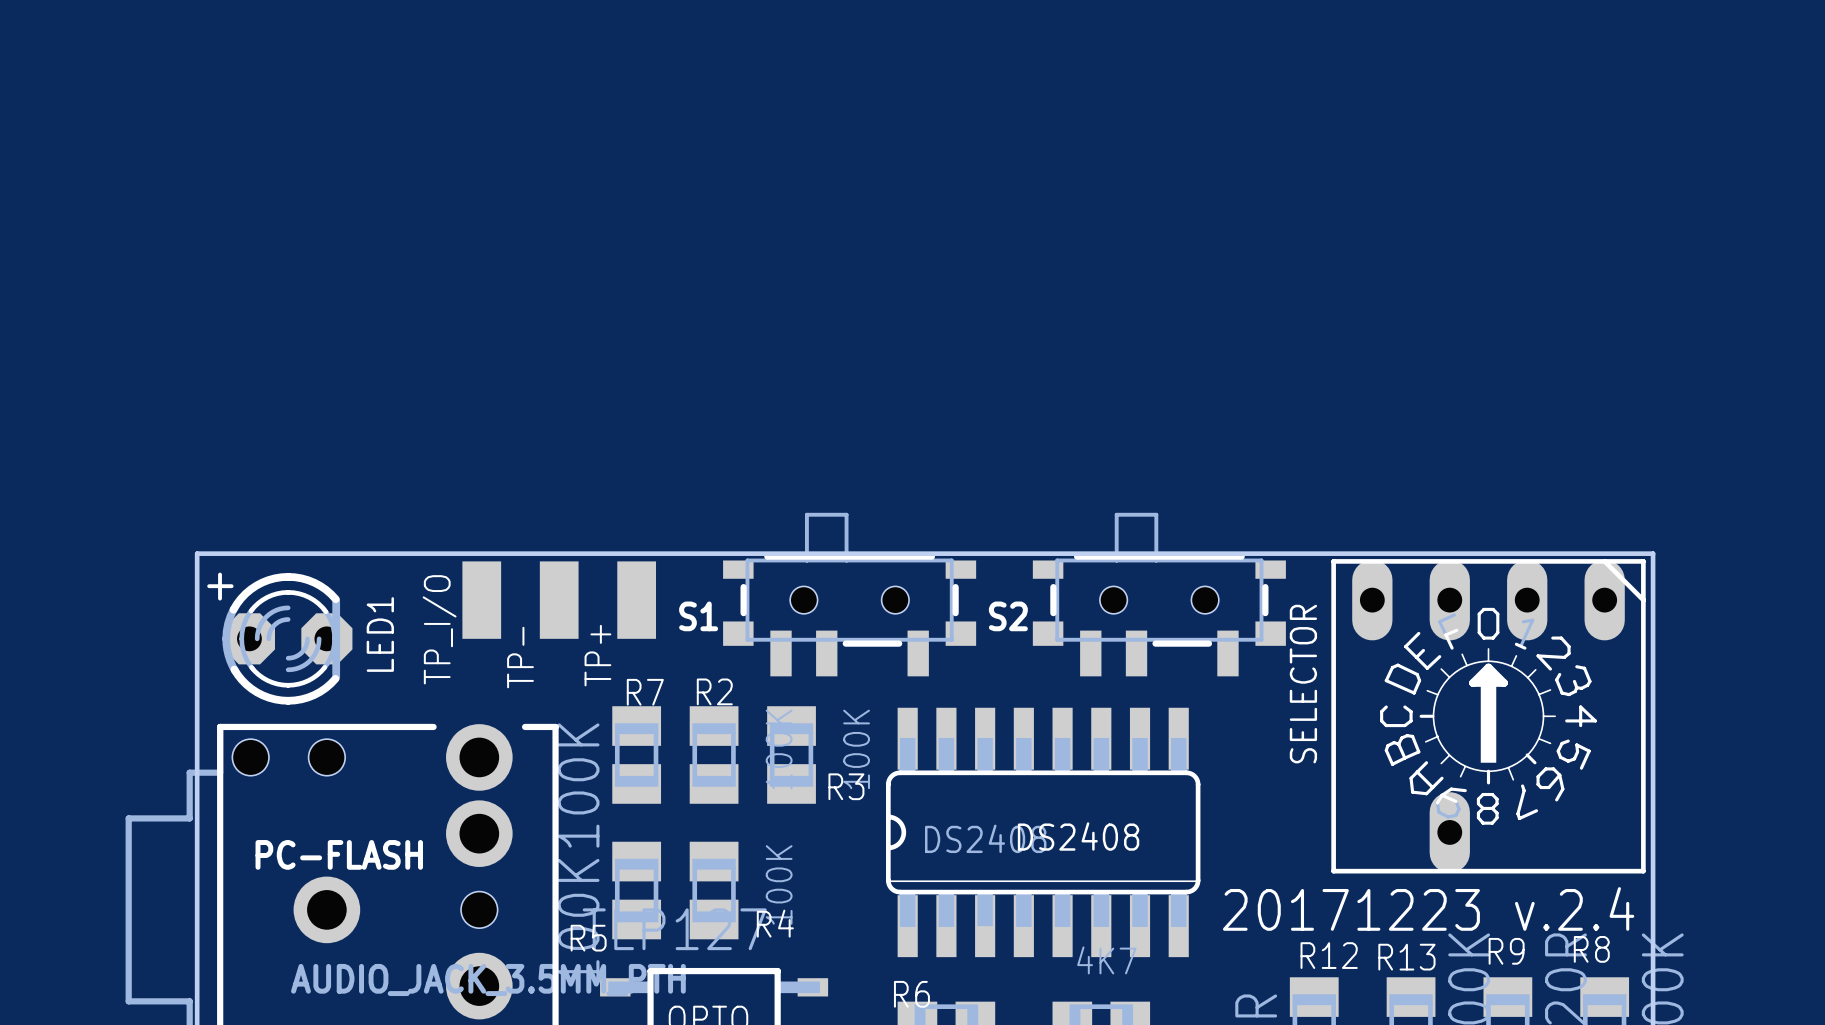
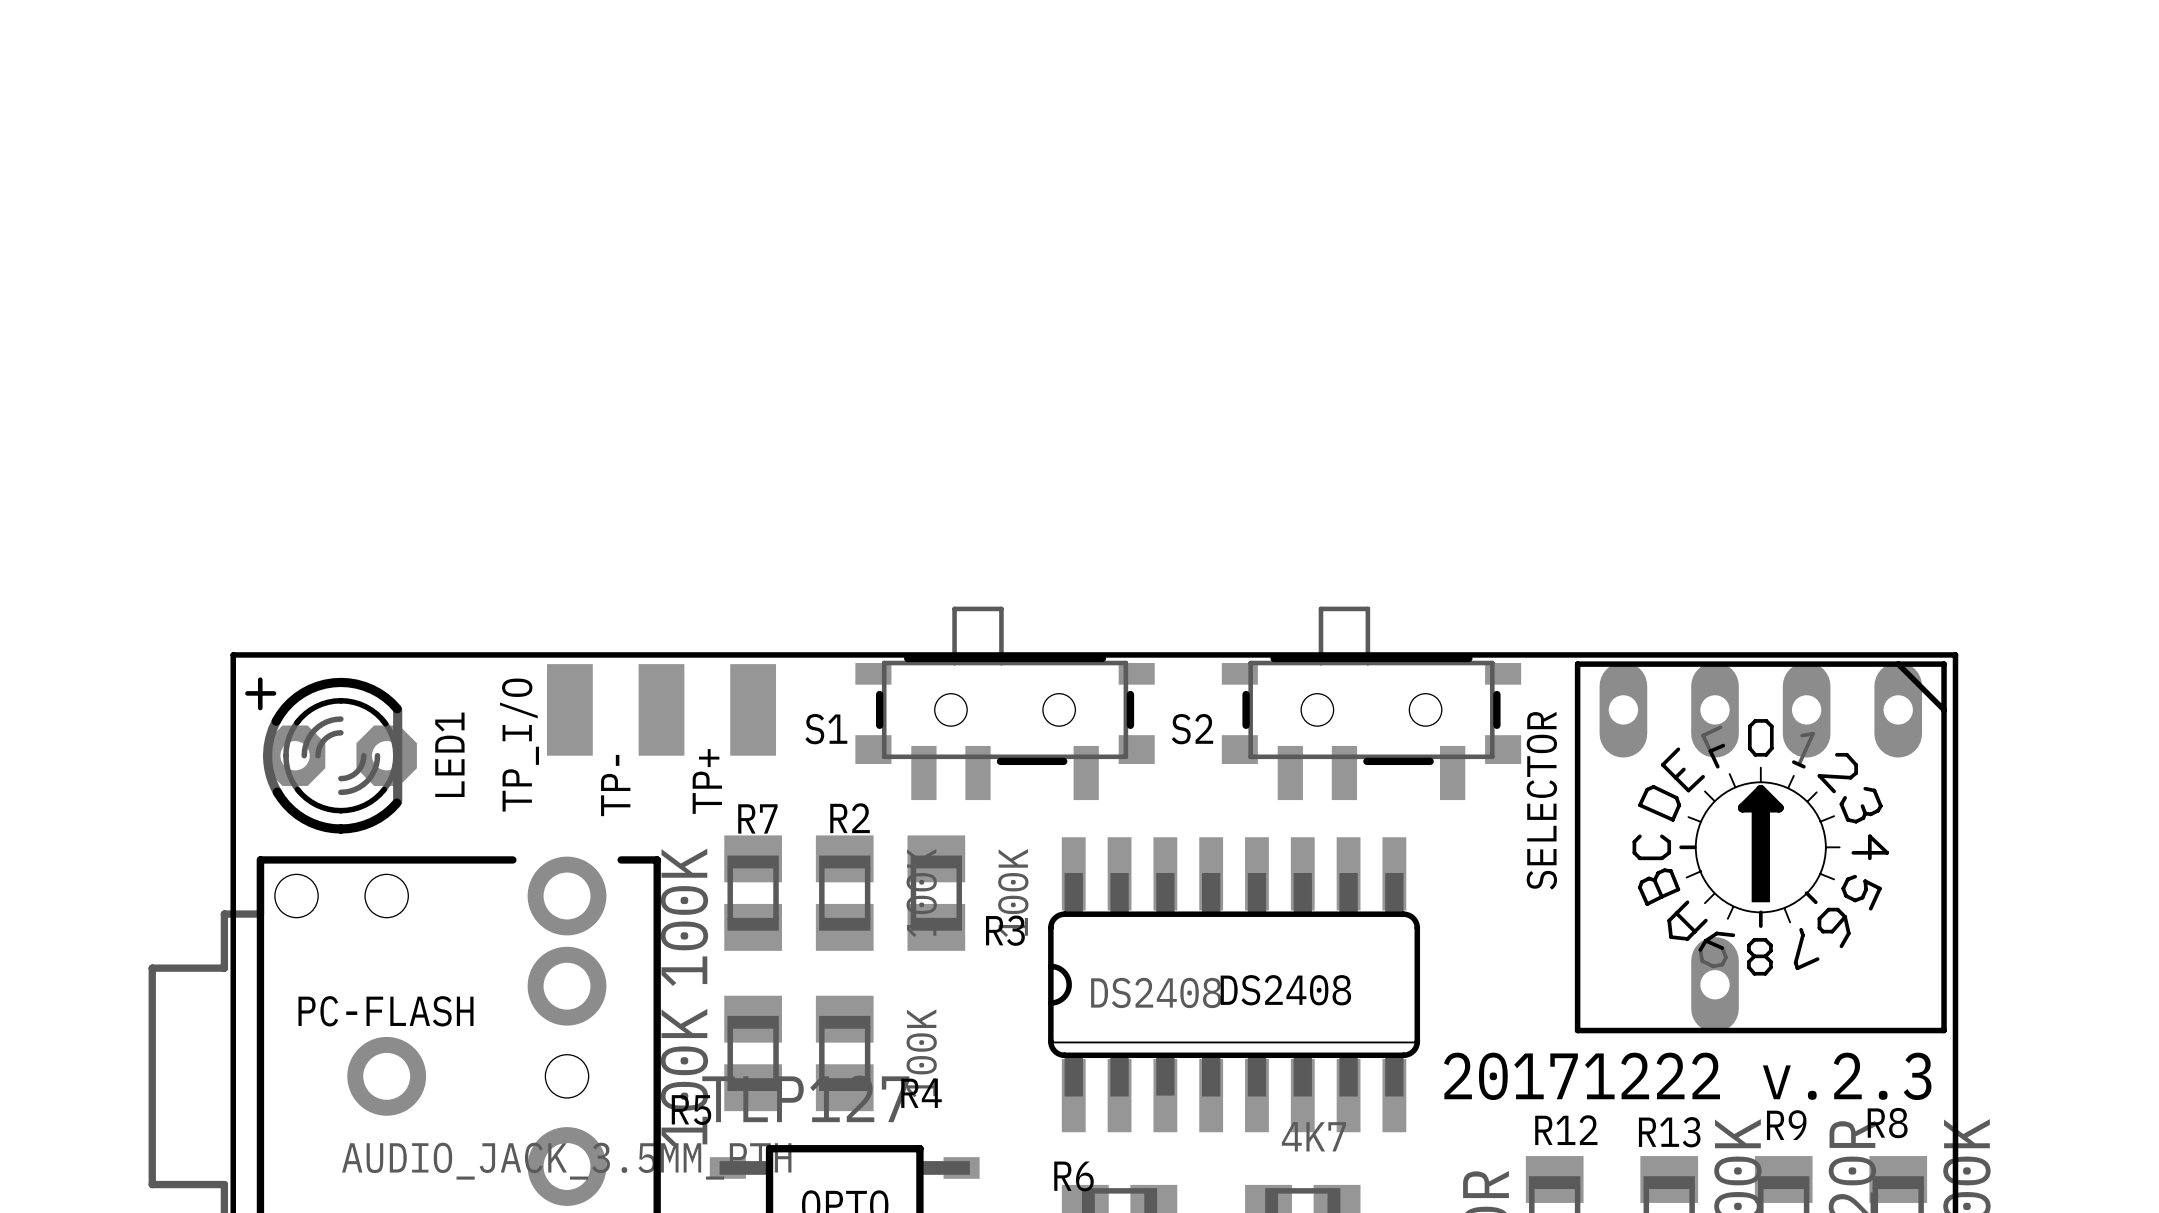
text: 20171223 v.2.4 (1428, 908) -> 20171222 v.2.3 (1687, 1076)

